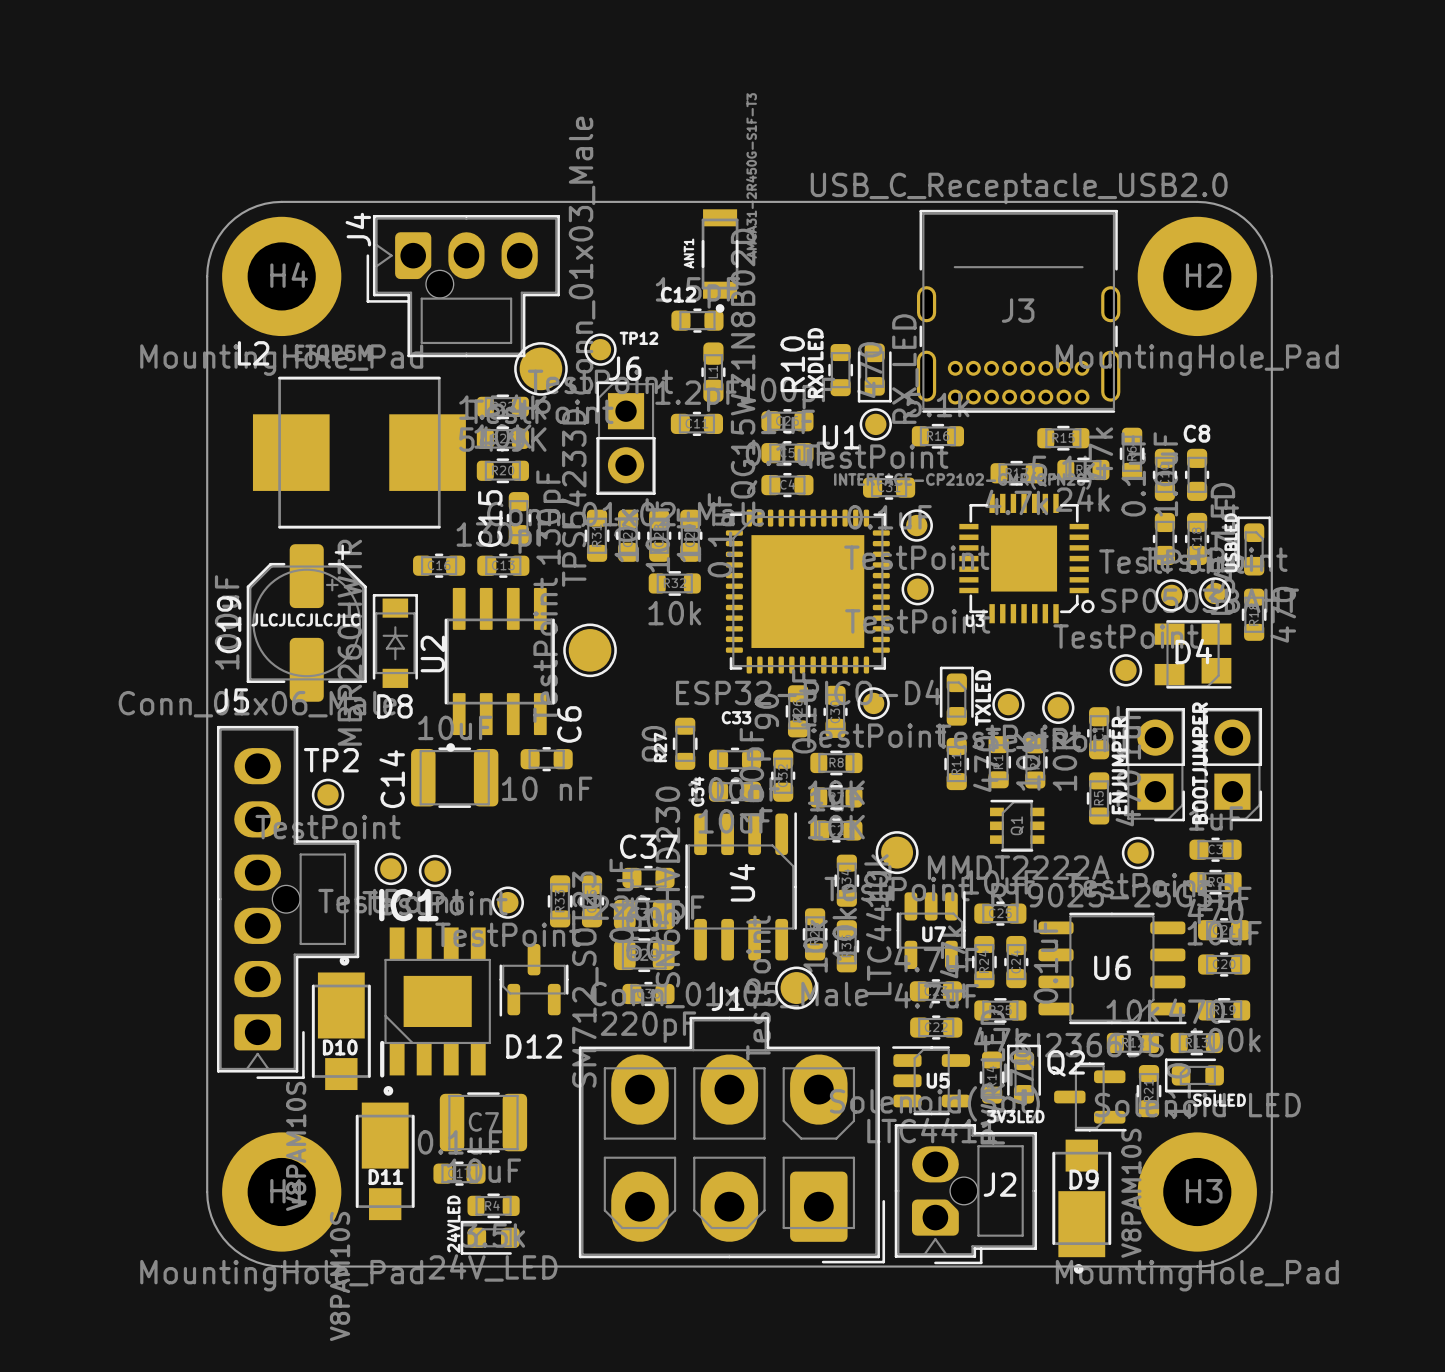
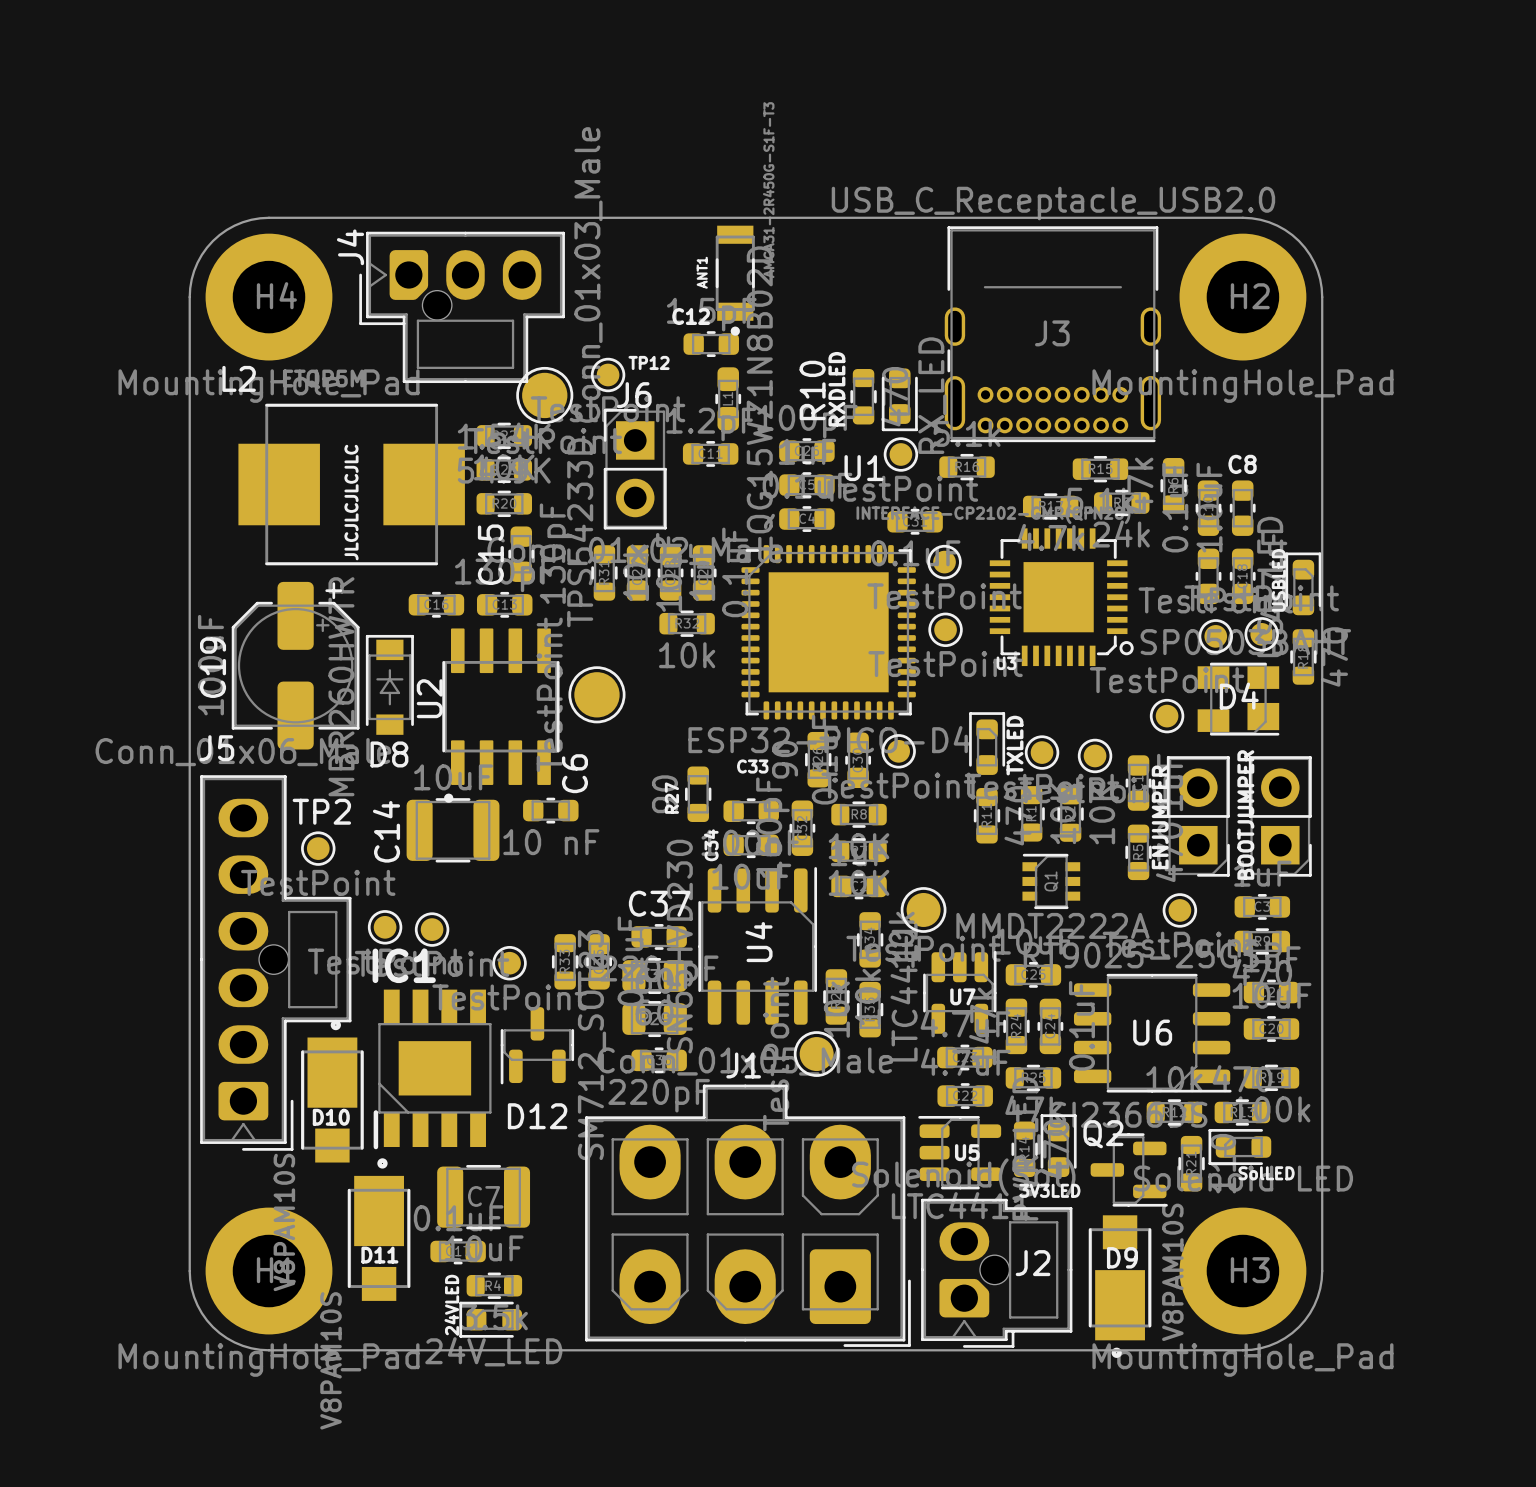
text rotation: 0° (305, 619) -> 90° counterclockwise (351, 502)
text position: JLCJLCJLCJLC (305, 619) -> JLCJLCJLCJLC (351, 502)

